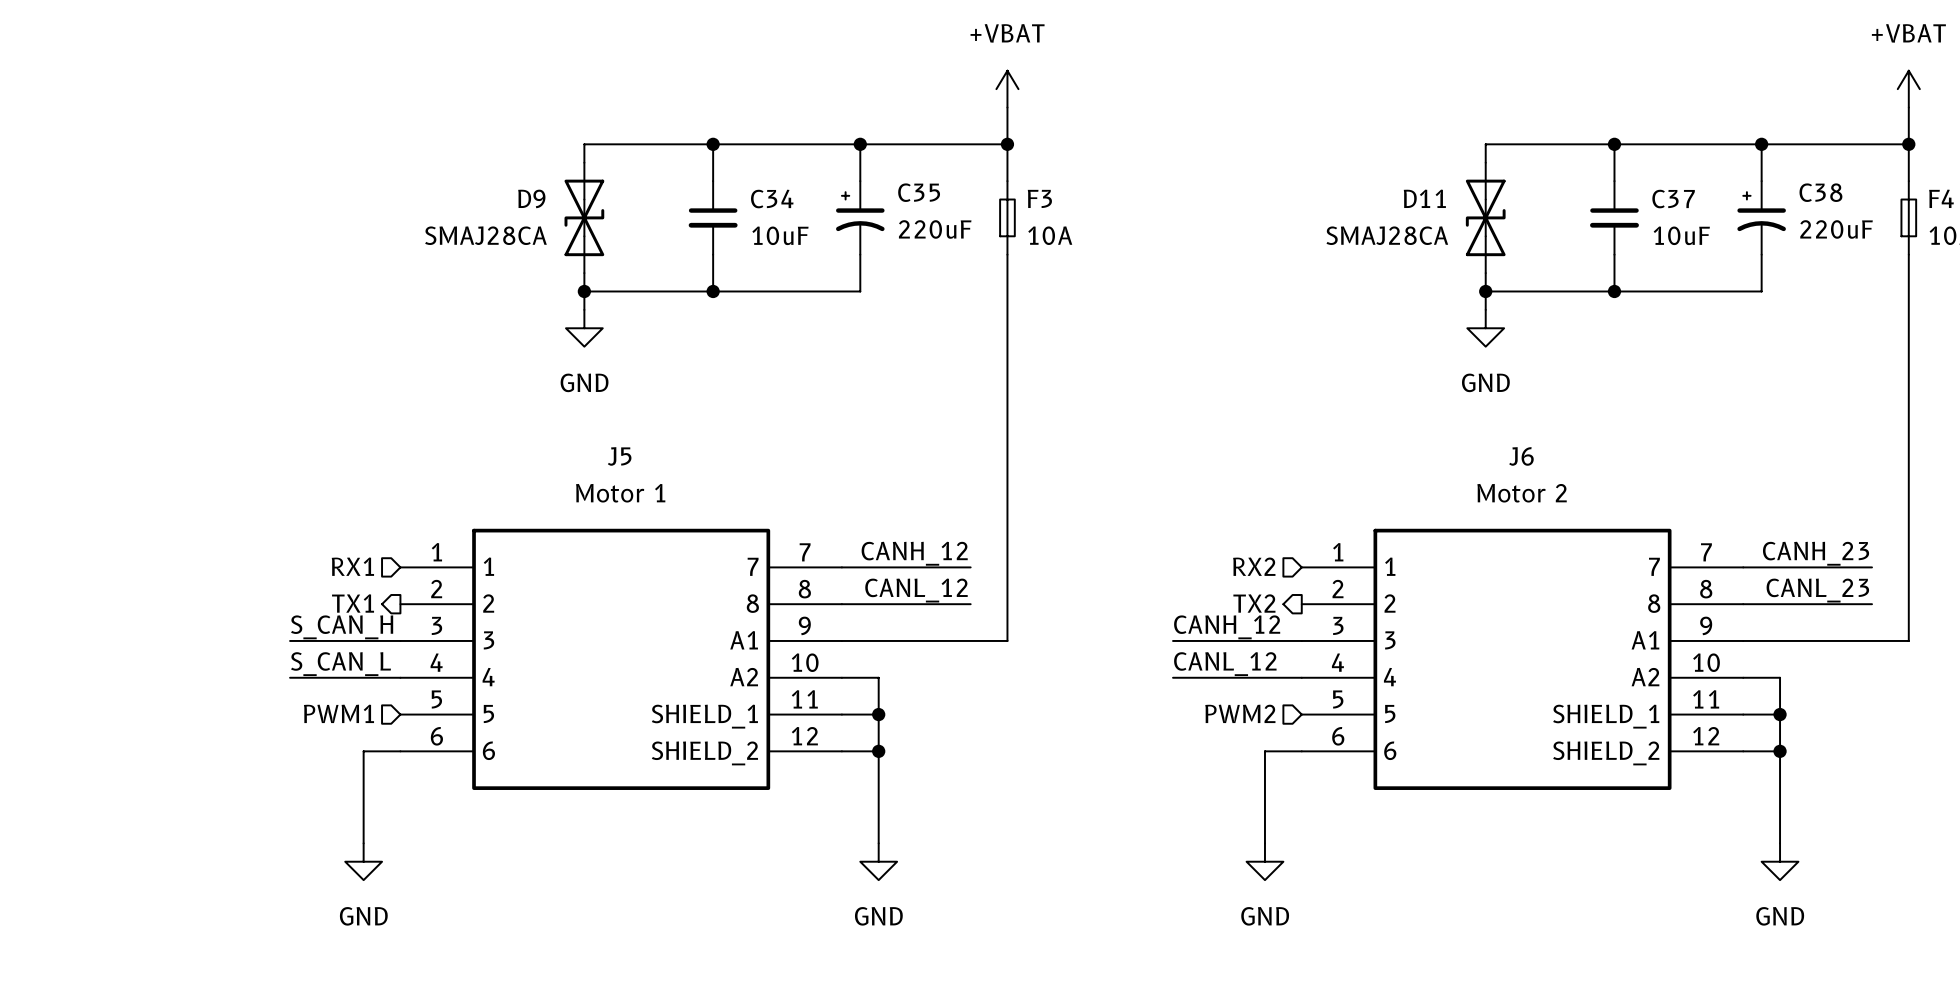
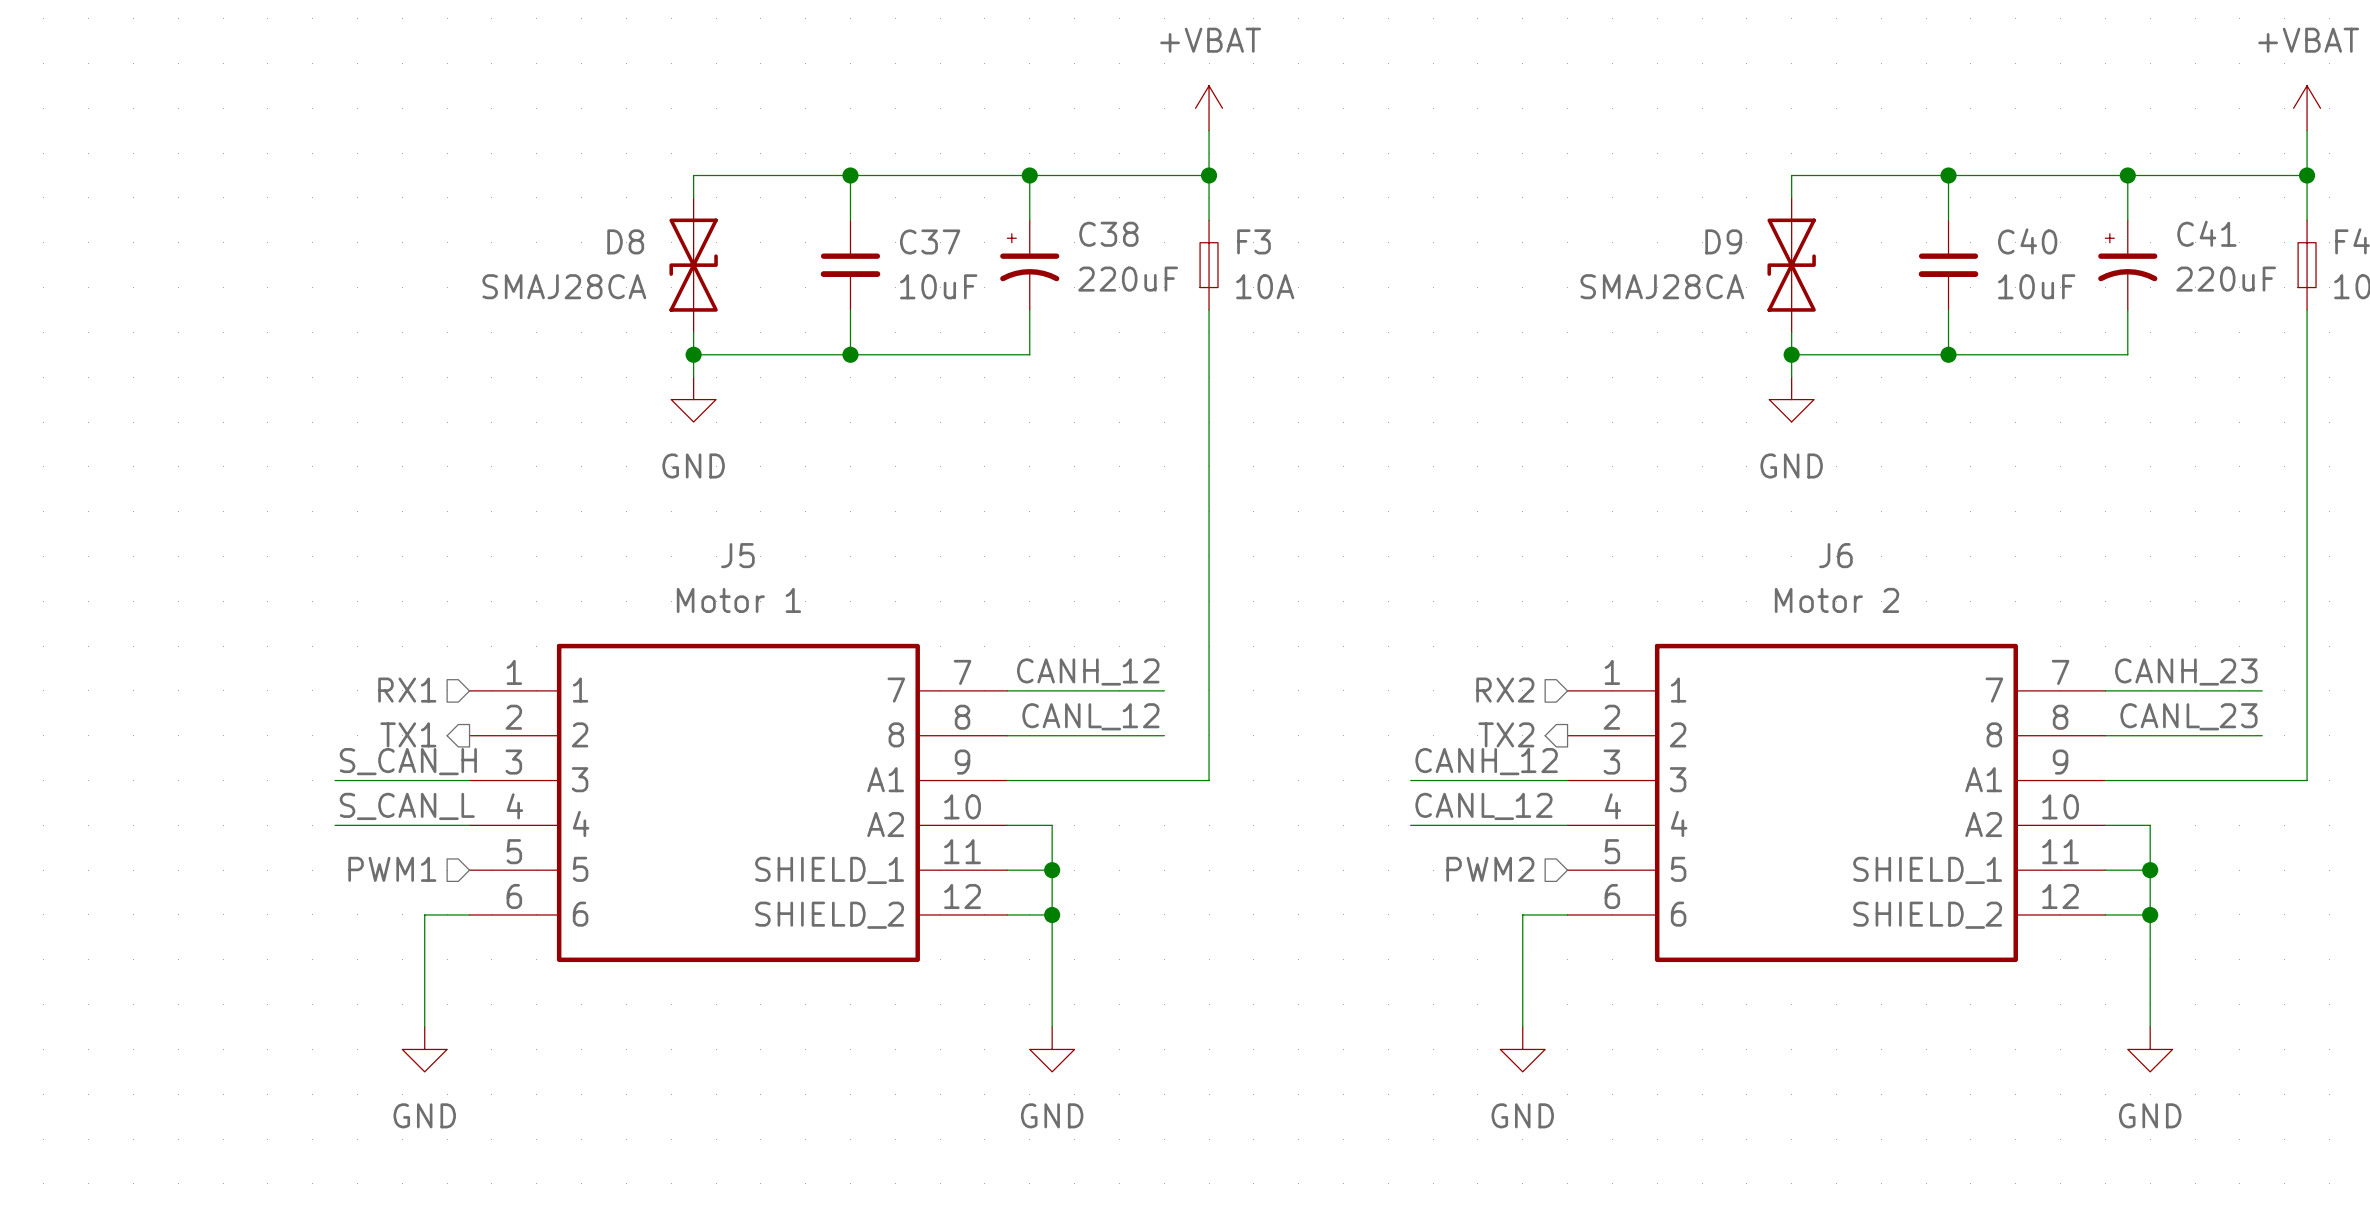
C35 name: C35 (919, 192) -> C38 (1108, 234)
C38 name: C38 (1820, 192) -> C41 (2206, 233)
D9 name: D9 (531, 198) -> D8 (625, 241)
D11 name: D11 (1424, 198) -> D9 (1723, 241)
C34 name: C34 (772, 199) -> C37 (930, 242)
C37 name: C37 (1673, 199) -> C40 (2027, 241)

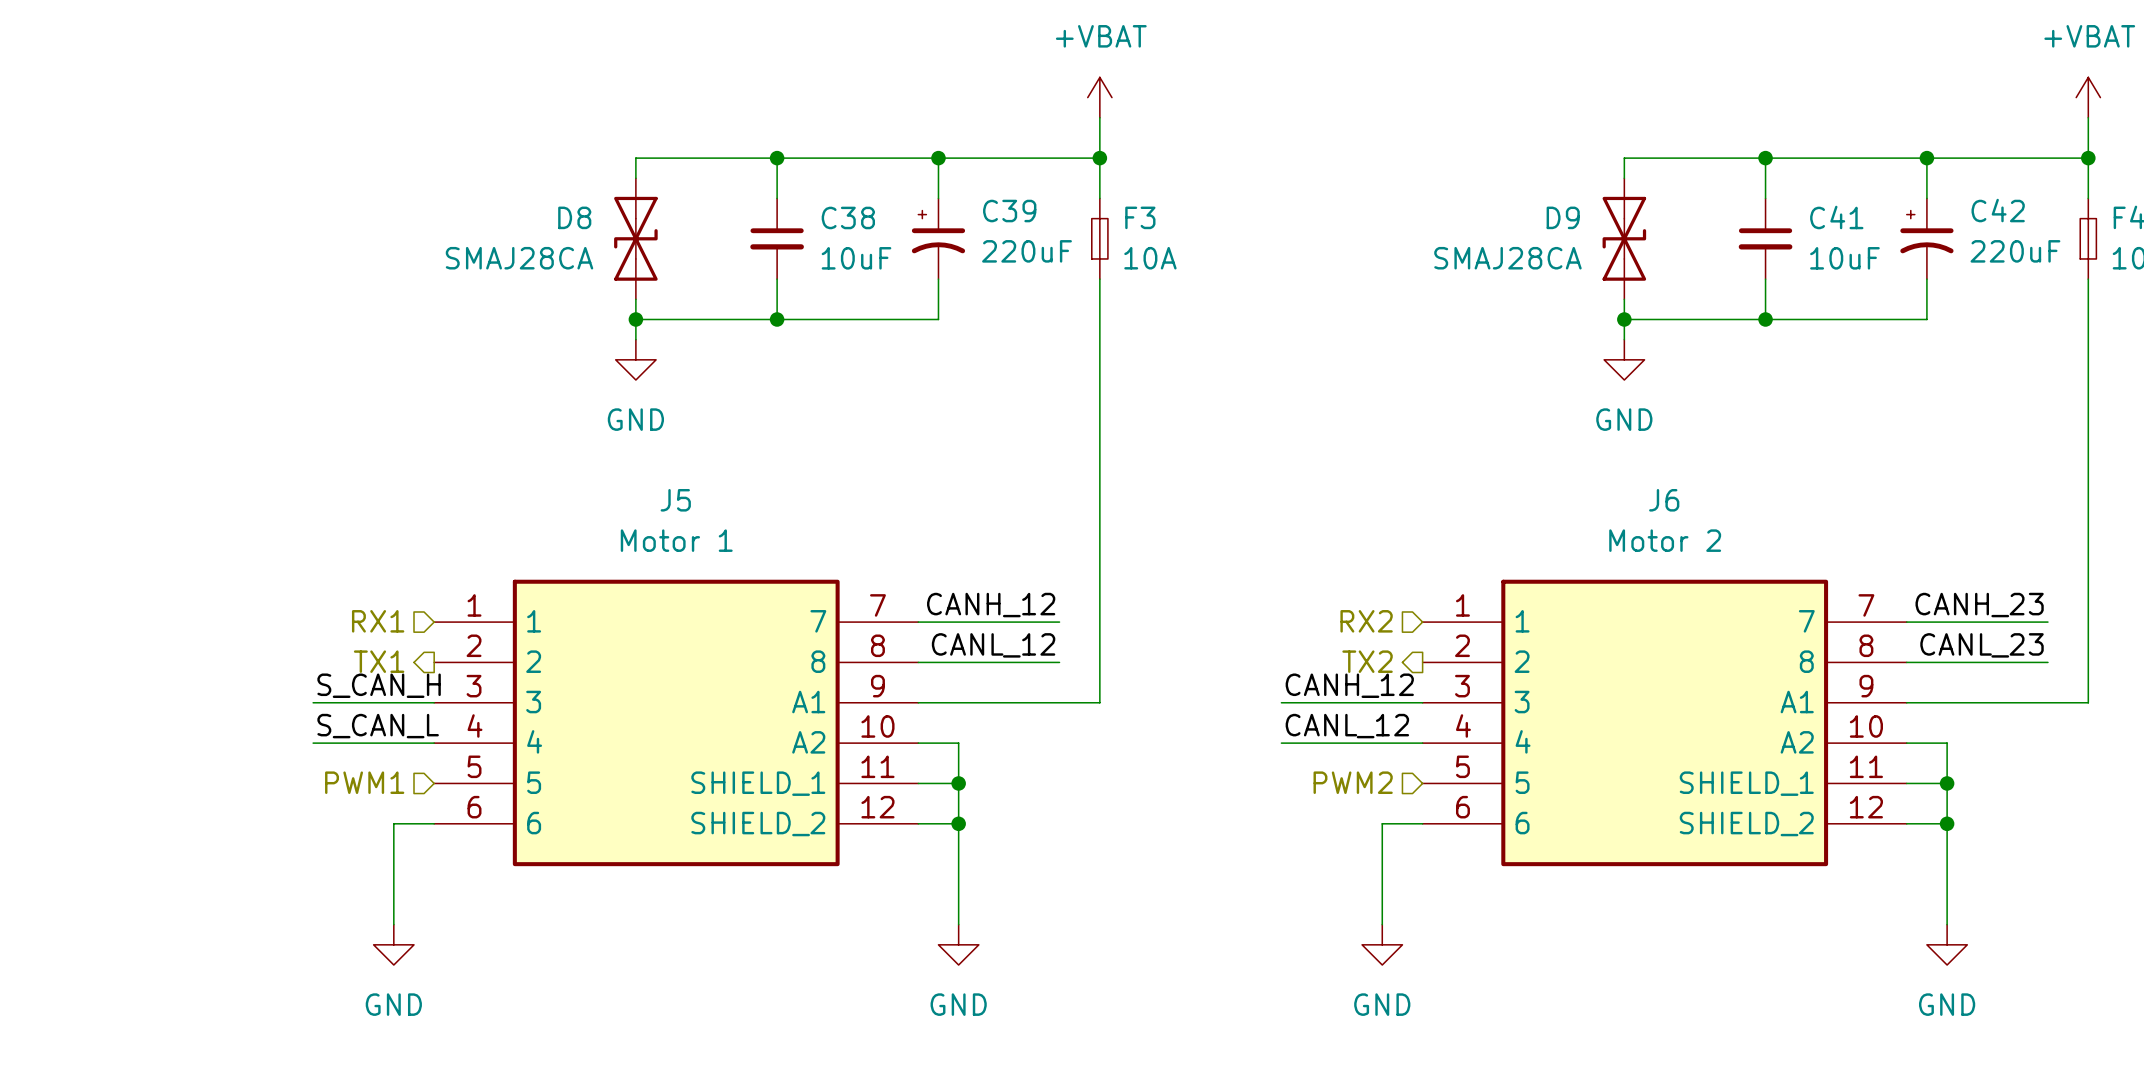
C41 name: C41 (2206, 233) -> C42 (1998, 210)
C38 name: C38 (1108, 234) -> C39 (1009, 211)
C40 name: C40 (2027, 241) -> C41 (1836, 217)
C37 name: C37 (930, 242) -> C38 (848, 217)

